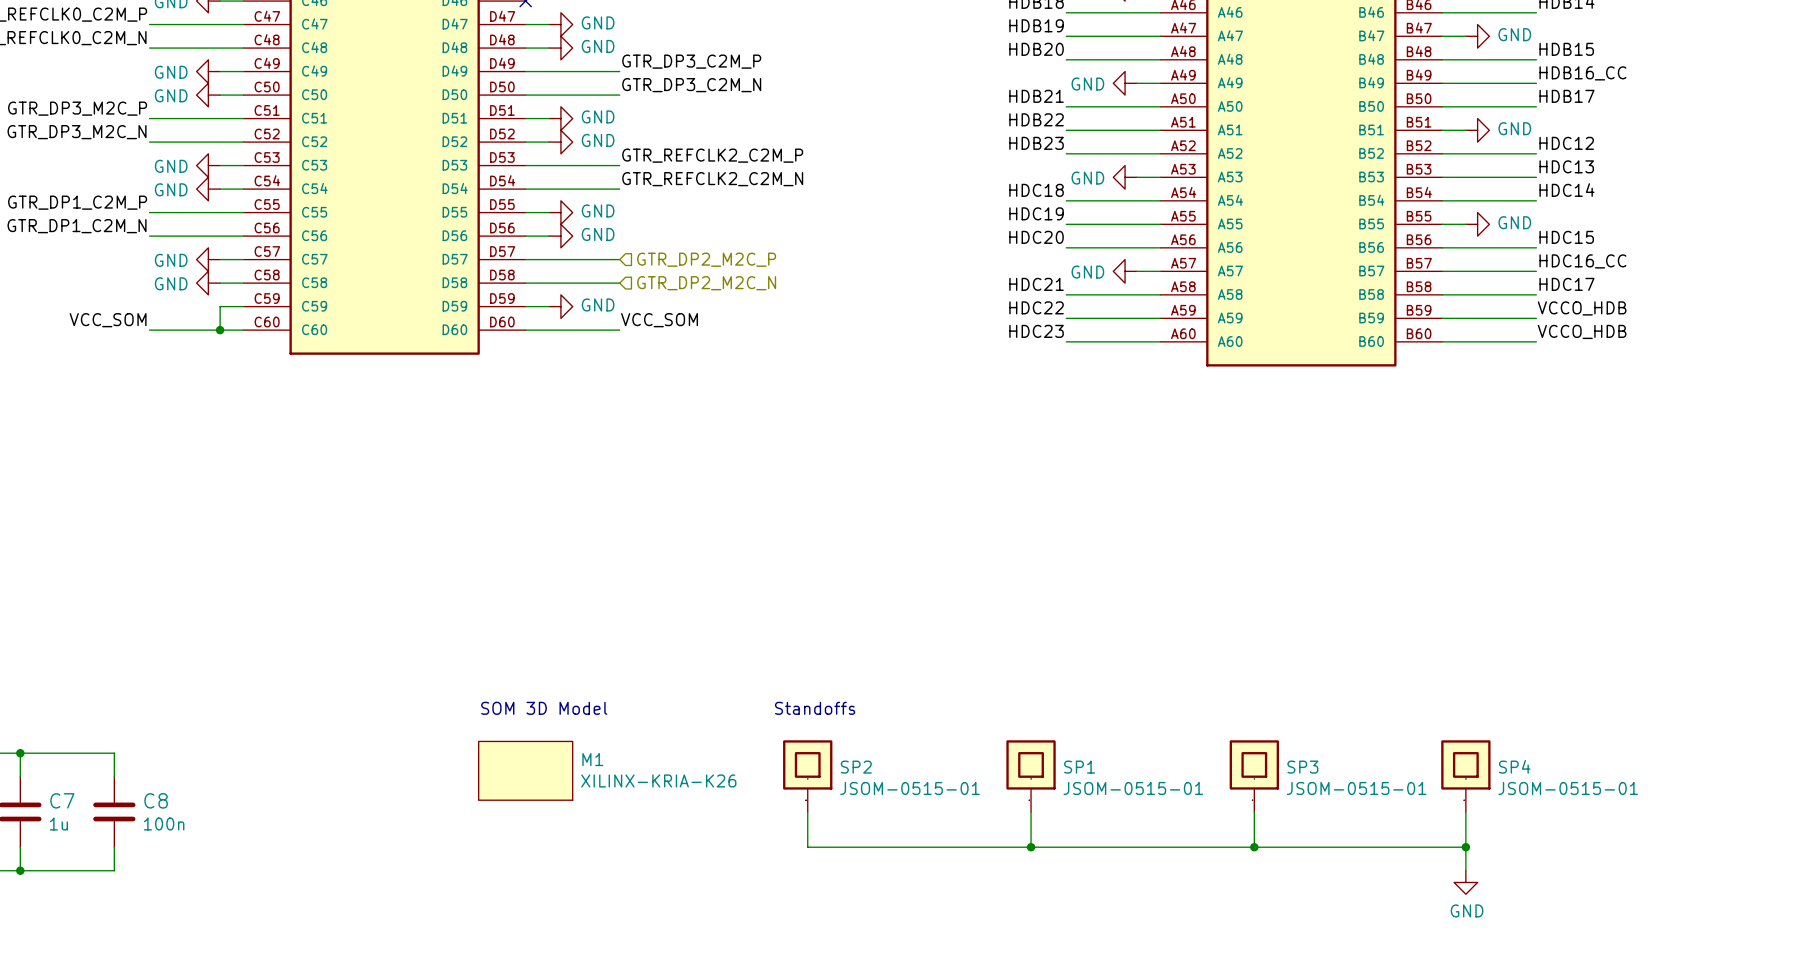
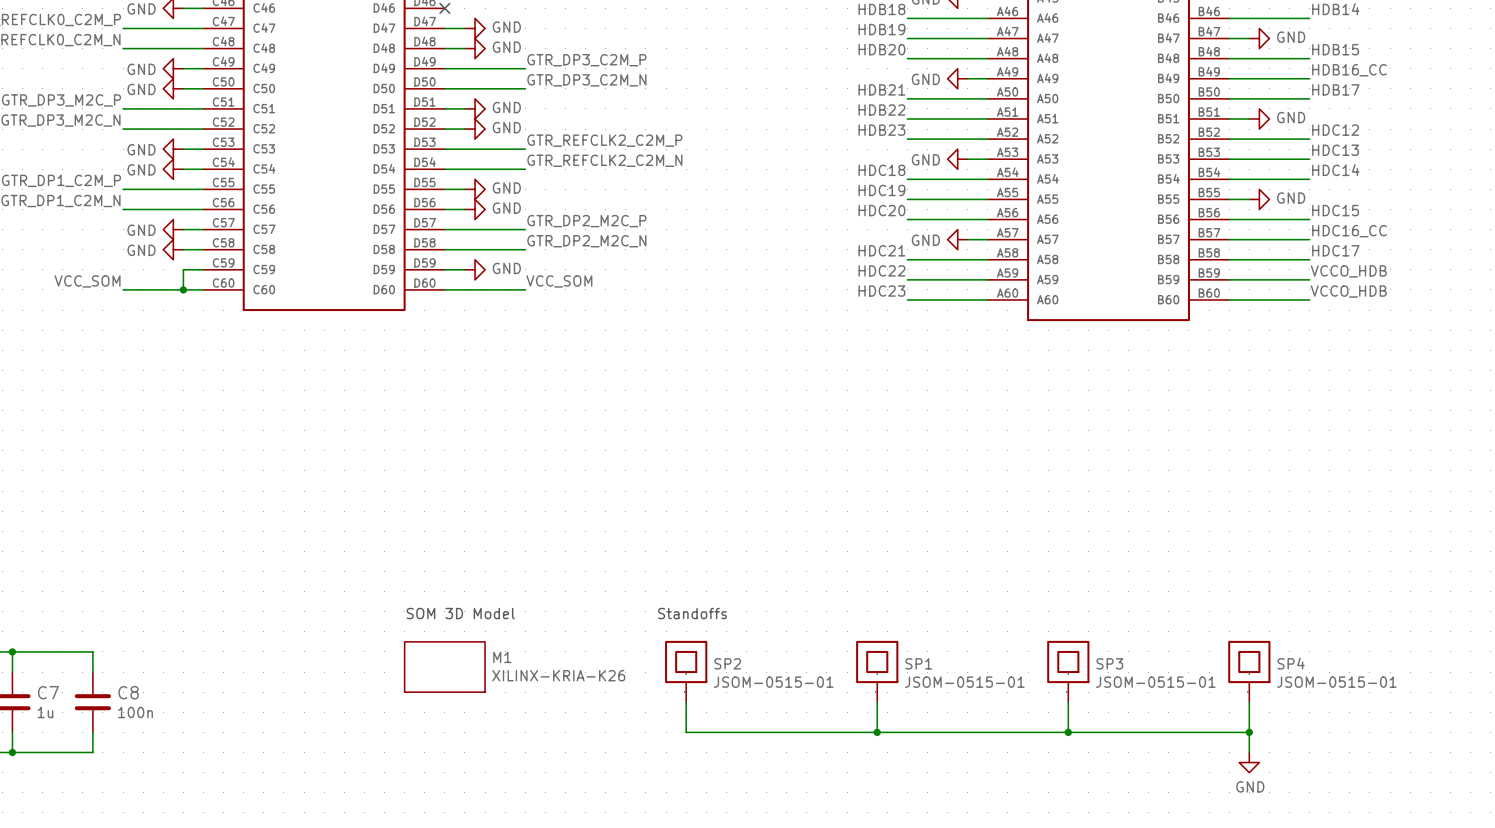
label: none -> GTR_DP2_M2C_P (586, 221)
hierarchical label: GTR_DP2_M2C_P (706, 259) -> none
label: none -> GTR_DP2_M2C_N (586, 241)
hierarchical label: GTR_DP2_M2C_N (706, 283) -> none

